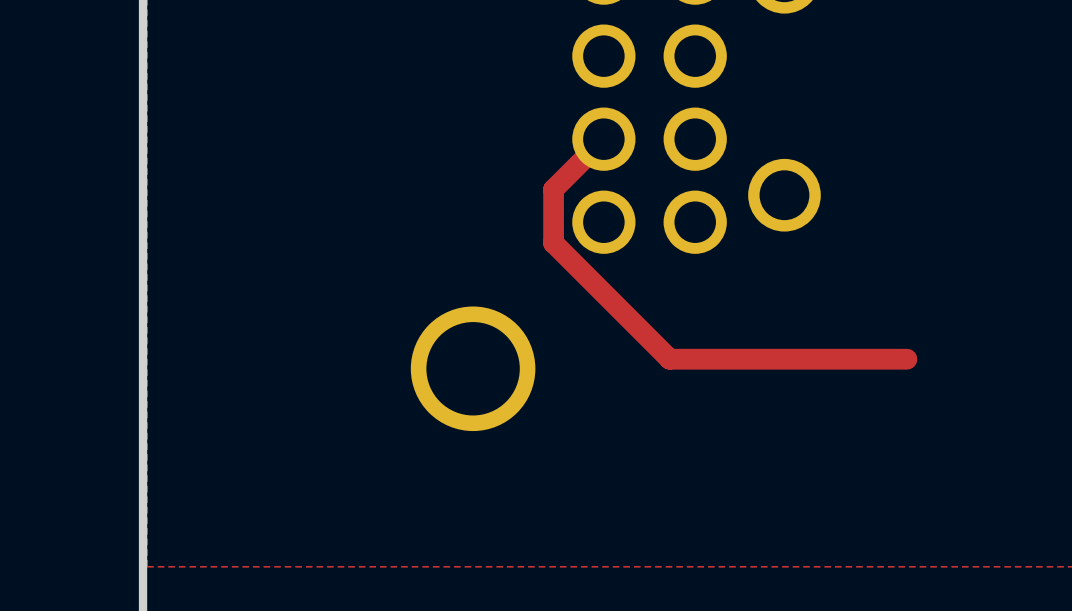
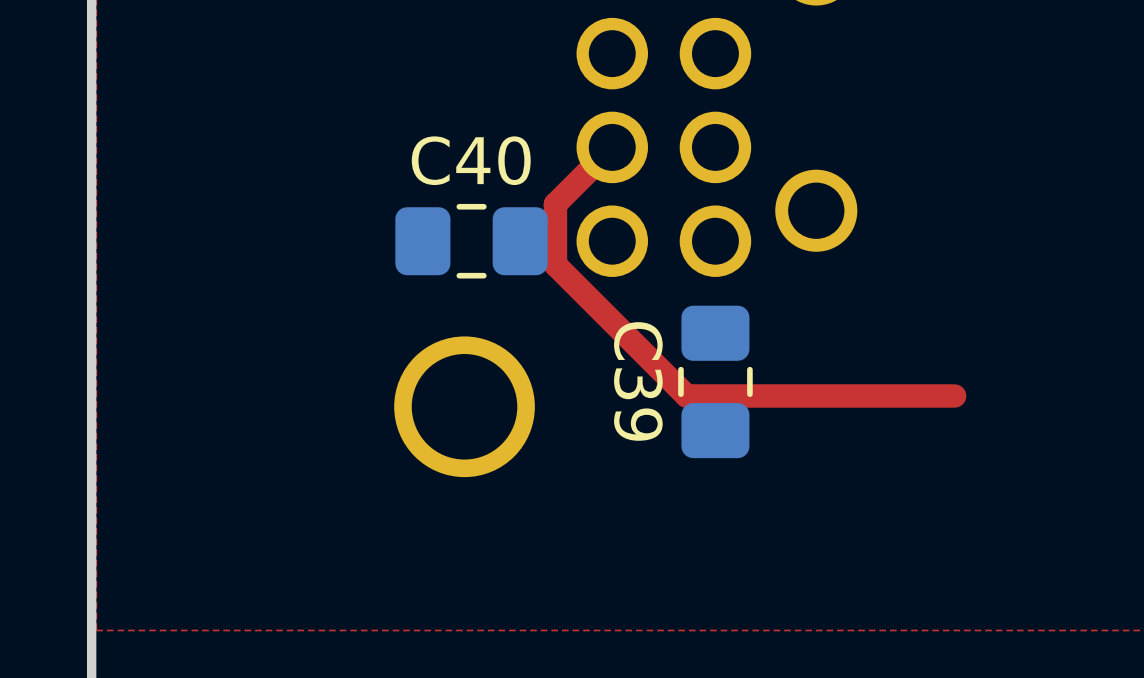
C40: none -> (471, 241)
C39: none -> (715, 381)

